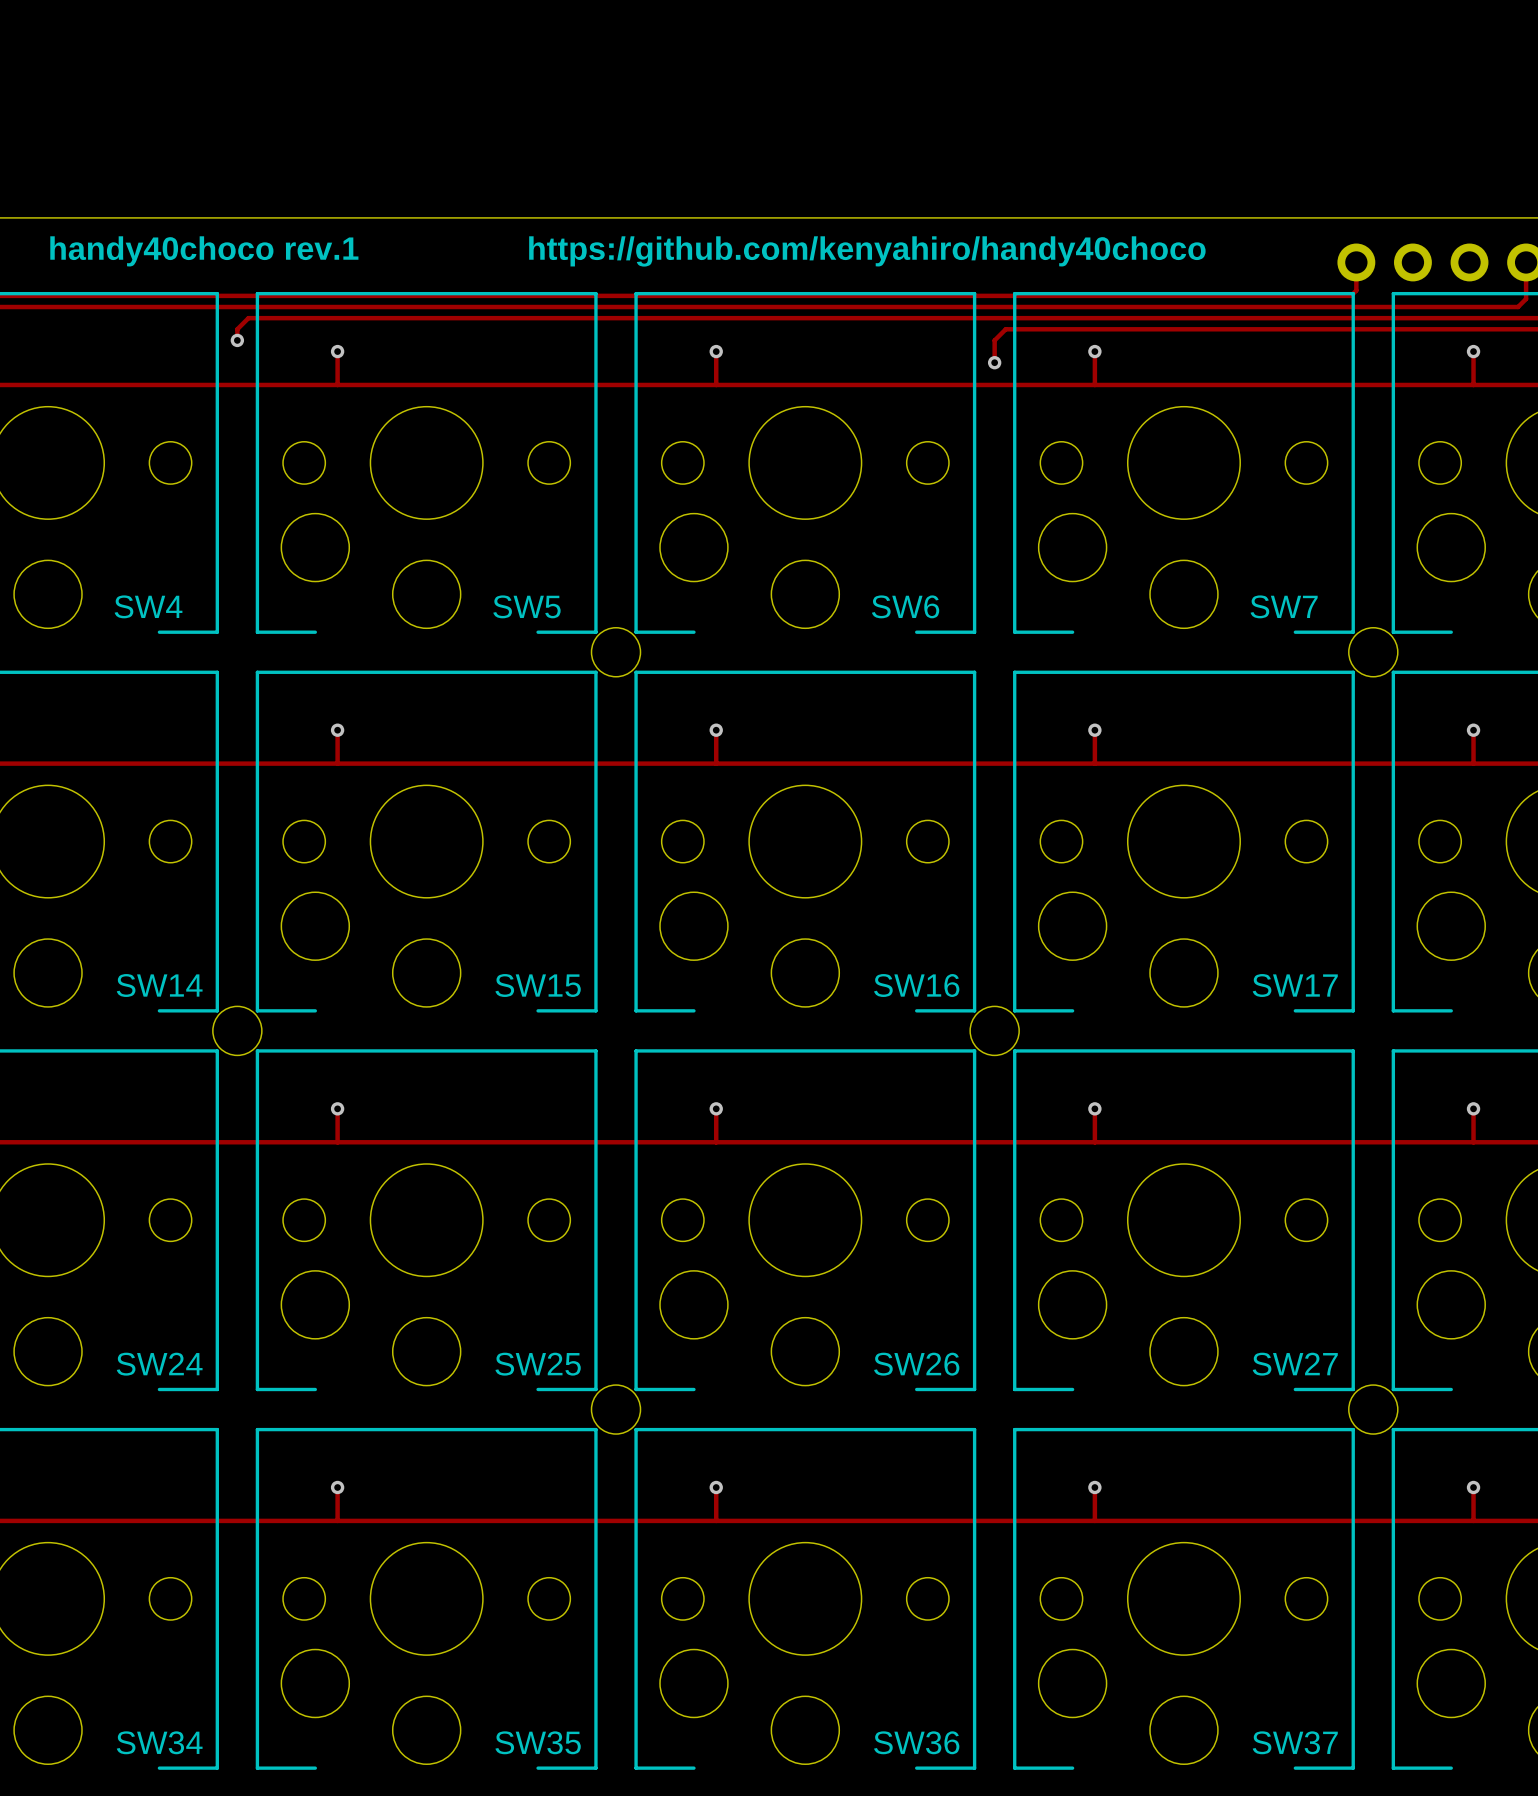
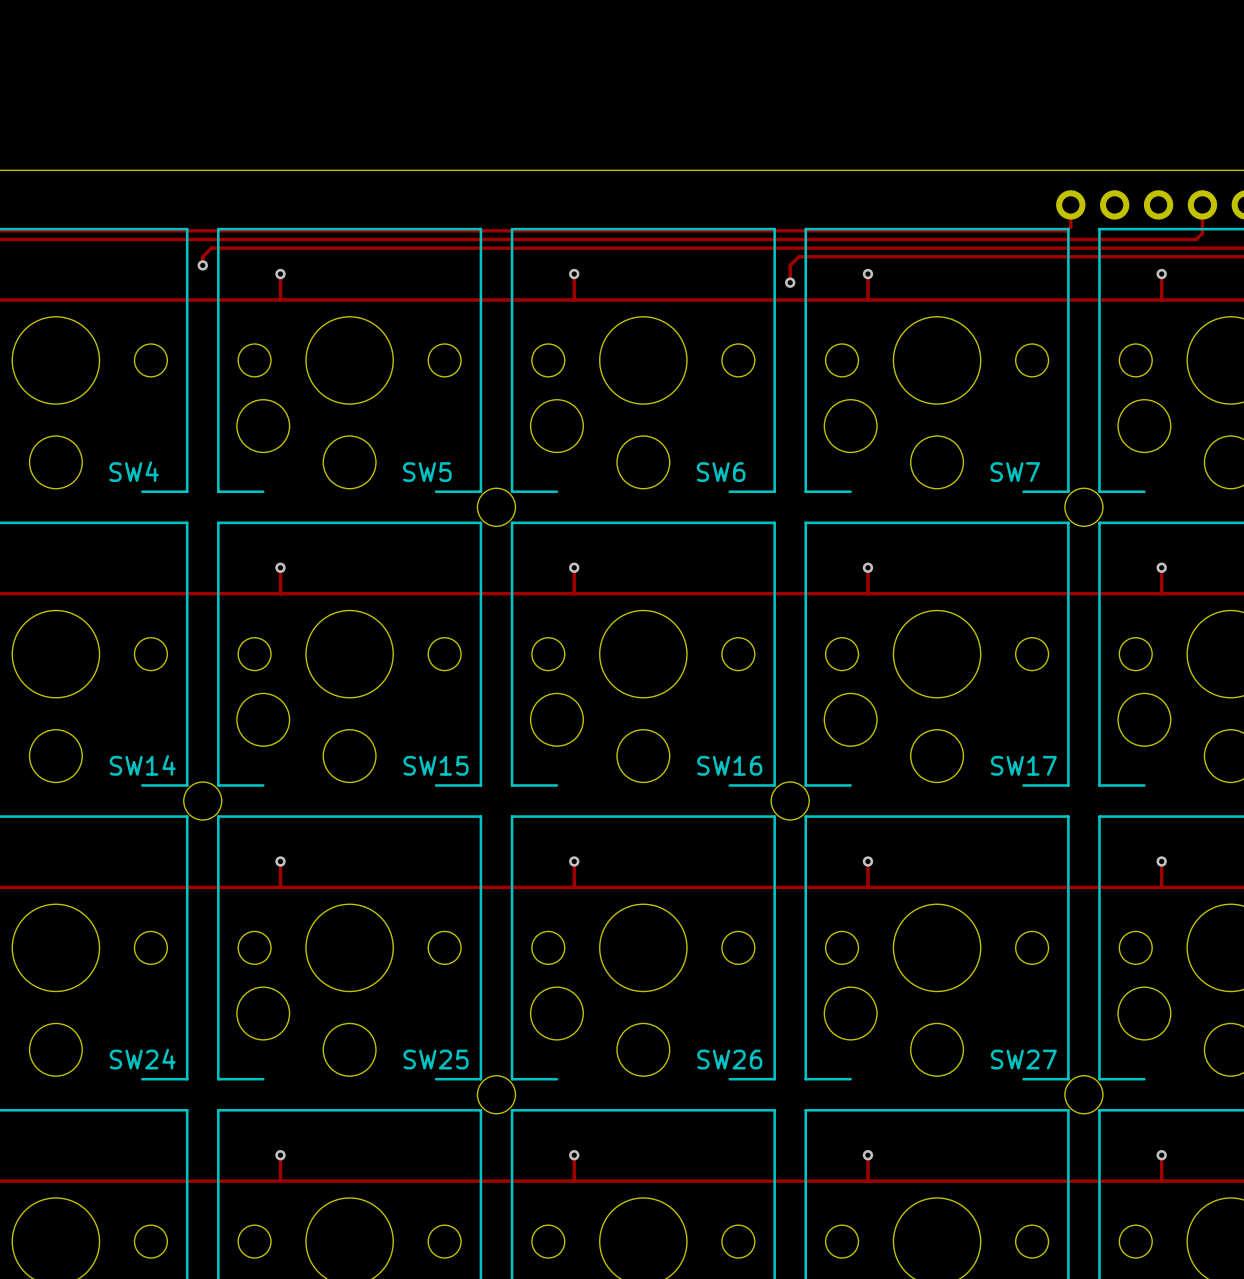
text: handy40choco rev.1 (204, 251) -> none
text: https://github.com/kenyahiro/handy40choco (867, 251) -> none

